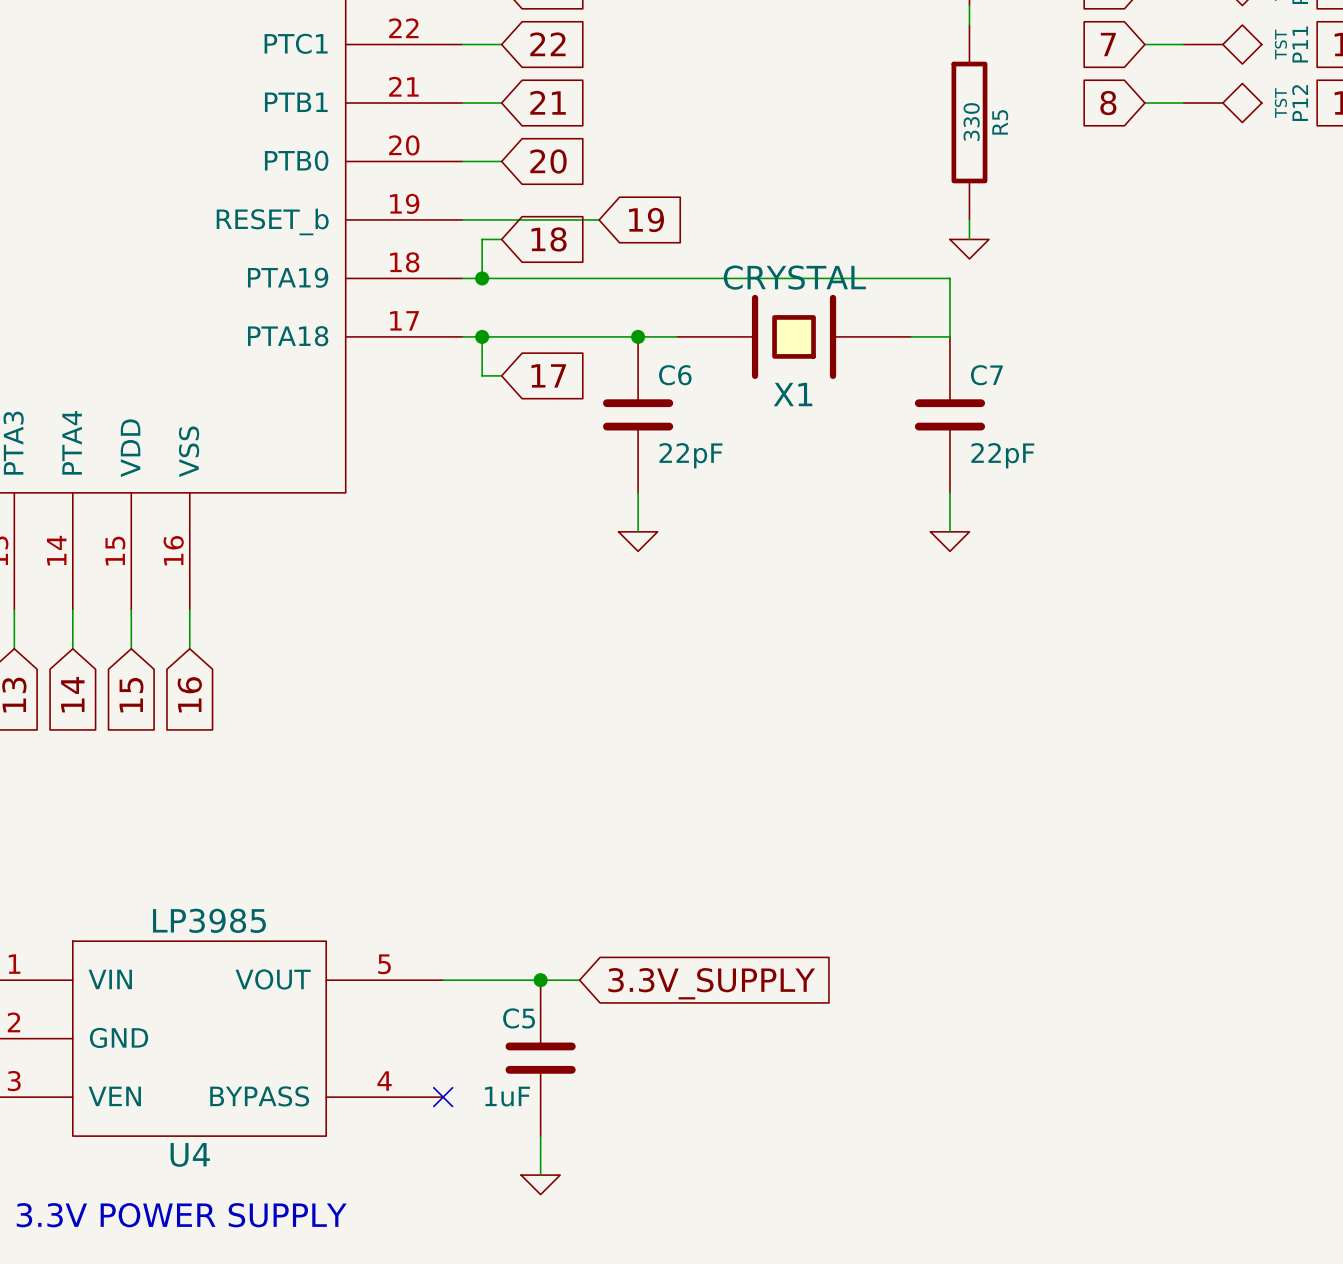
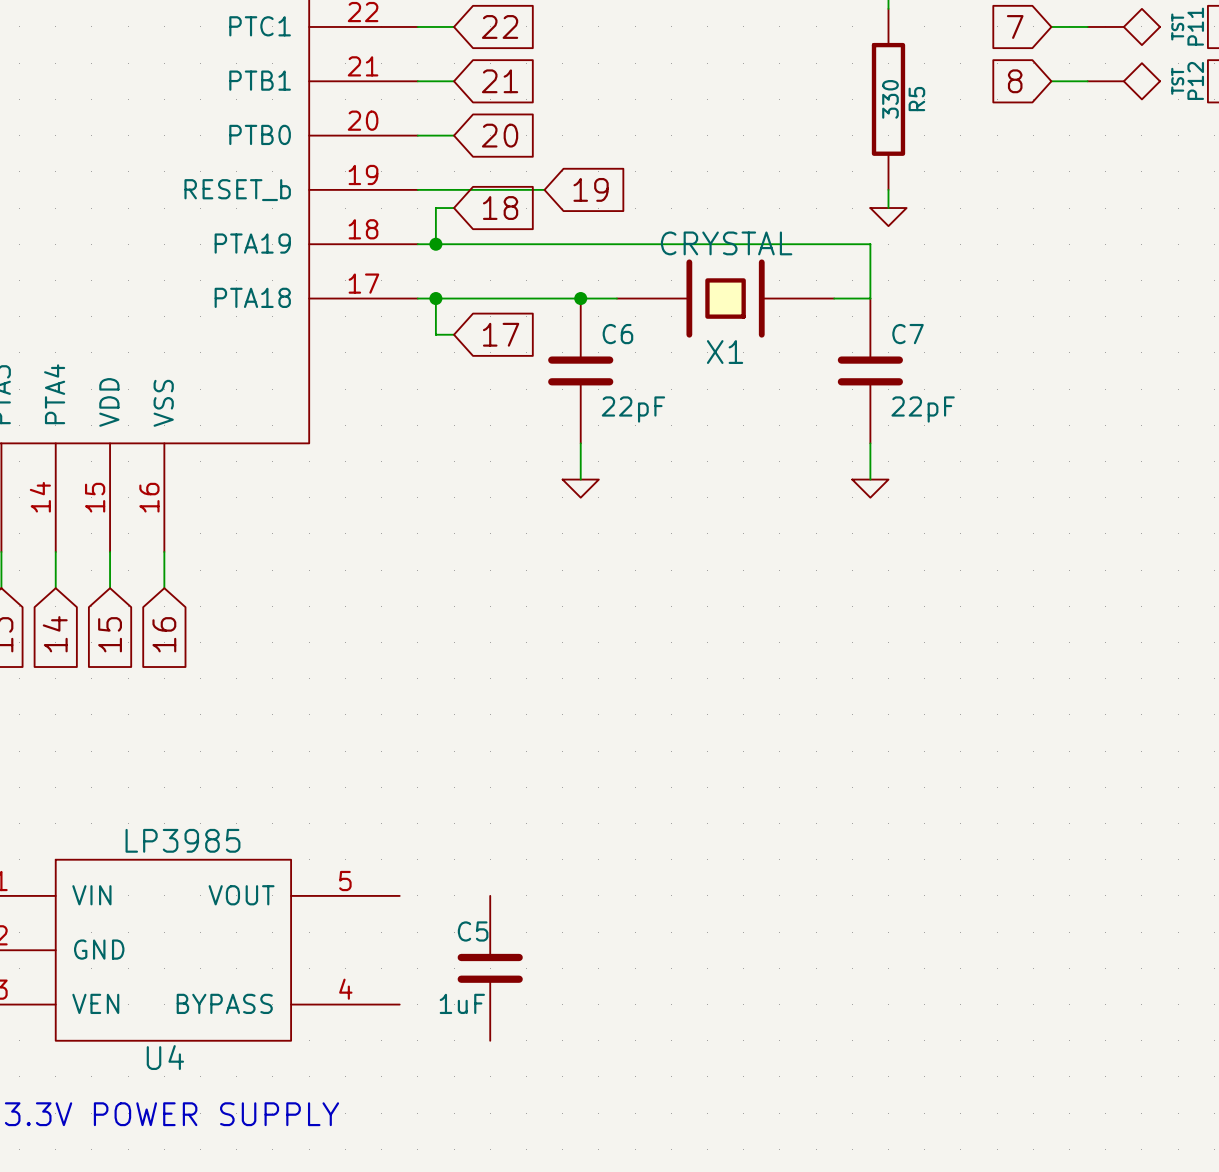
wire: (443, 980) (579, 980) -> none
junction: (540, 980) -> none
global label: 3.3V_SUPPLY (711, 983) -> none
no-connect mark: (443, 1097) -> none
wire: (540, 1136) (540, 1175) -> none
power symbol: (540, 1184) -> none

